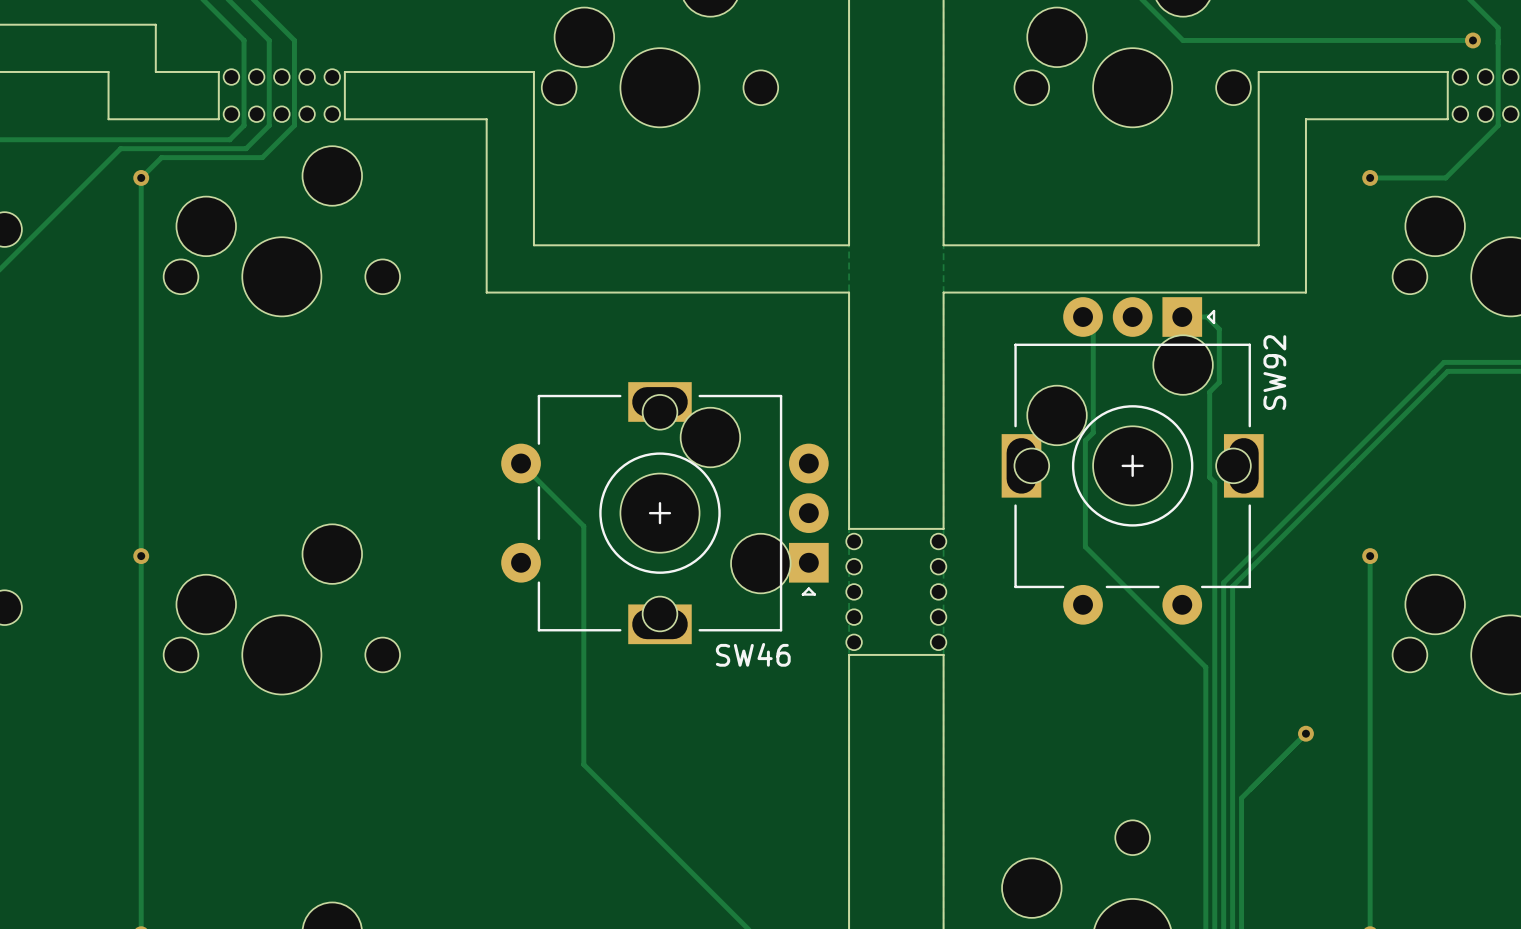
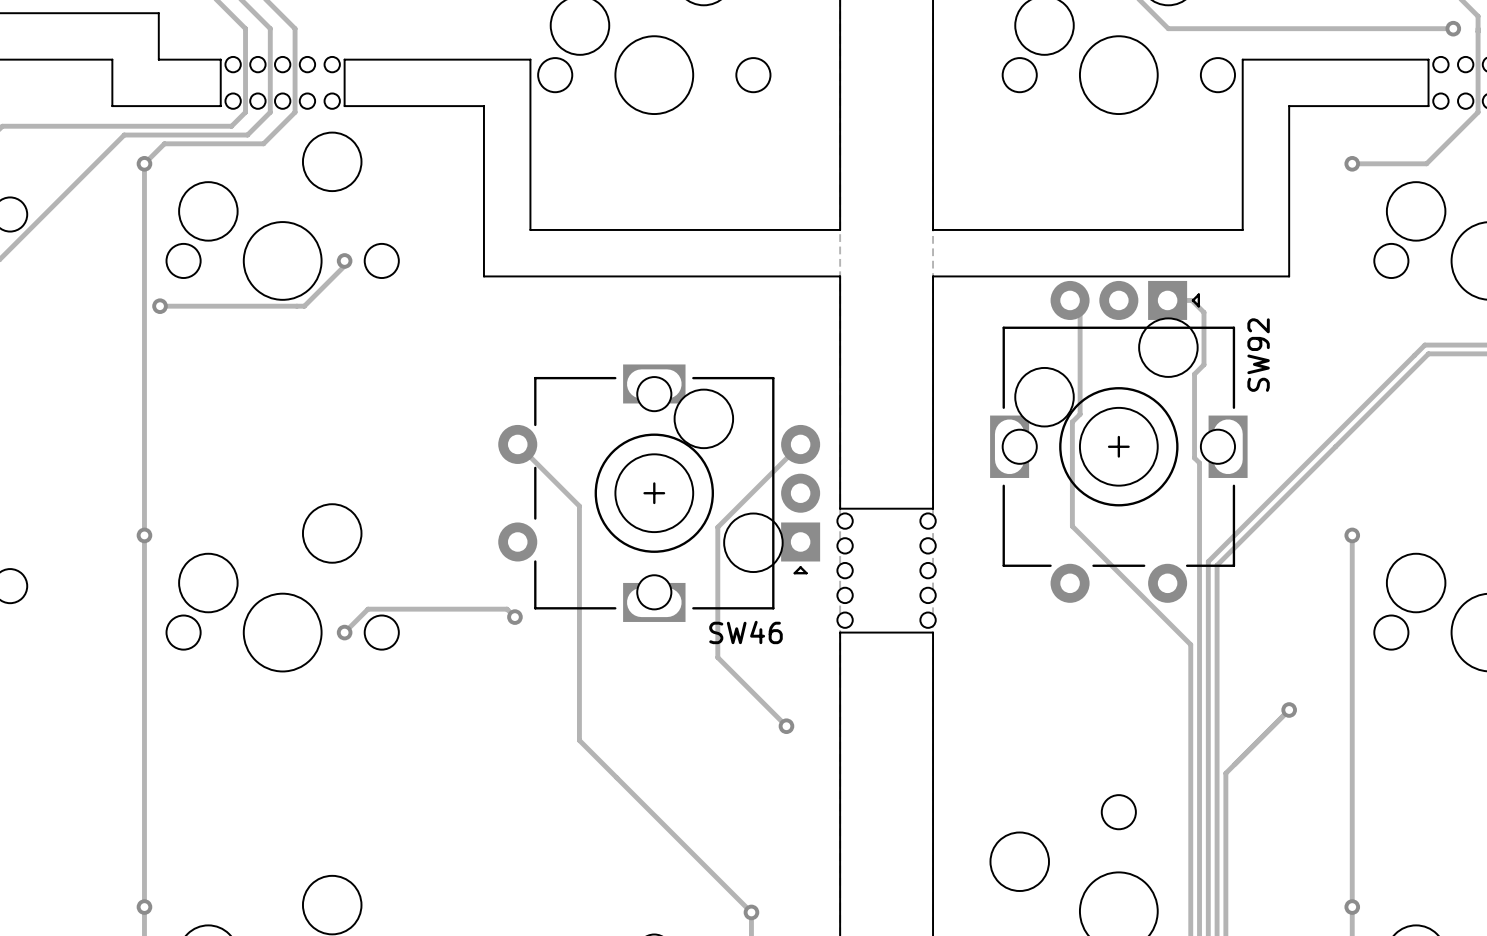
track: none -> (344, 260) (344, 265) (304, 306) (160, 306)
via: none -> (344, 260)
via: none -> (160, 306)
track: none -> (800, 444) (717, 527) (717, 657) (786, 726)
track: none -> (514, 617) (507, 609) (368, 609) (344, 632)
via: none -> (514, 617)
via: none -> (344, 632)
via: none -> (786, 726)

